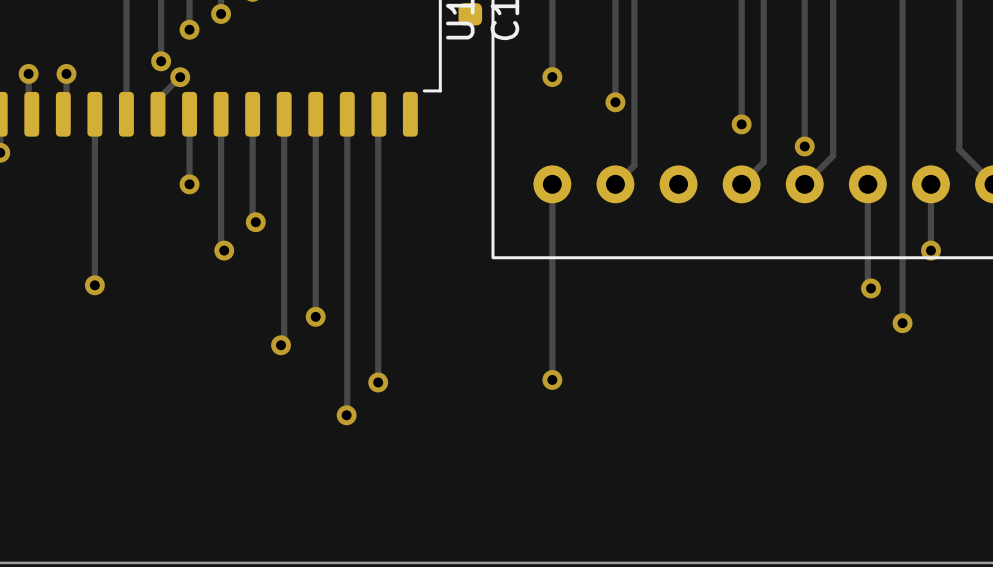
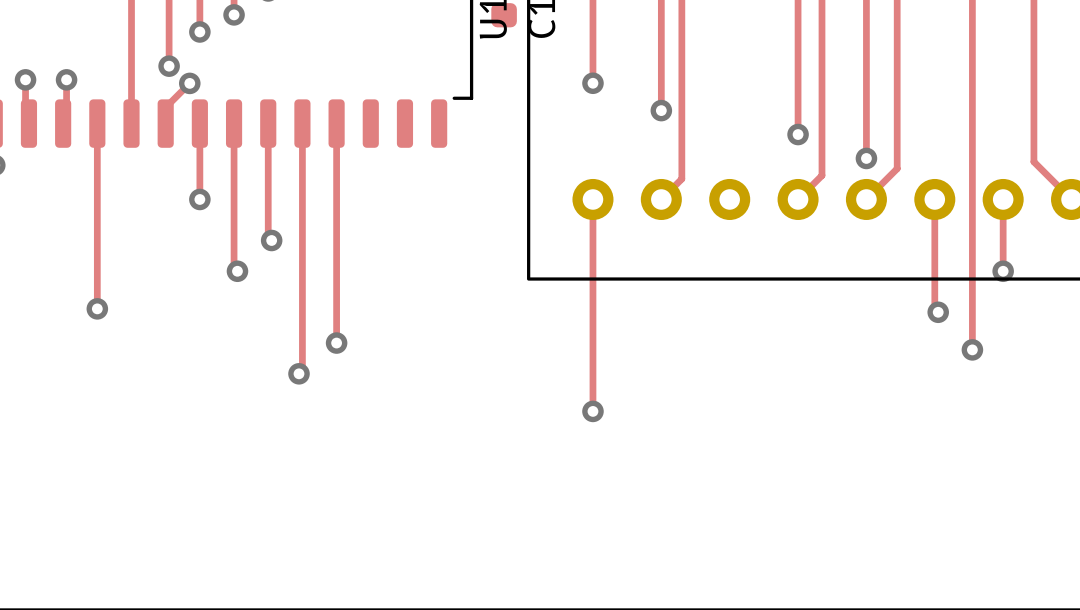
track: (347, 114) (346, 415) -> none
track: (378, 114) (378, 382) -> none
via: (378, 382) -> none
via: (346, 415) -> none

